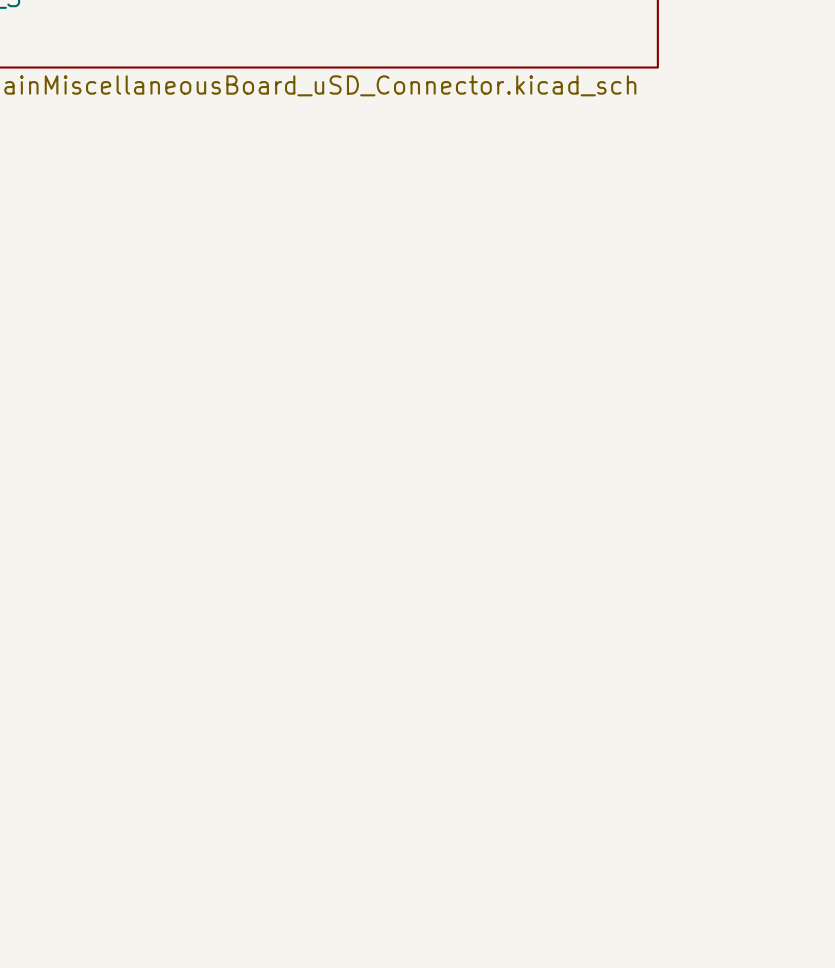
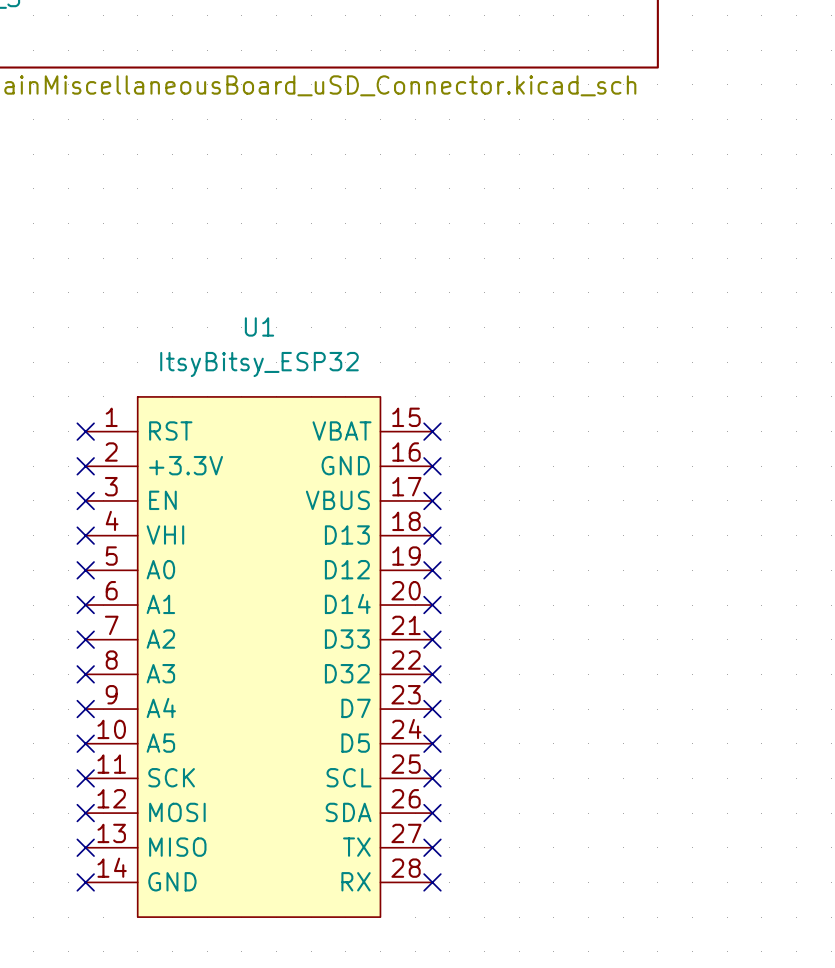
no-connect mark: none -> (85, 431)
no-connect mark: none -> (432, 431)
no-connect mark: none -> (85, 466)
no-connect mark: none -> (432, 466)
no-connect mark: none -> (85, 500)
no-connect mark: none -> (432, 500)
no-connect mark: none -> (85, 535)
no-connect mark: none -> (432, 535)
no-connect mark: none -> (85, 570)
no-connect mark: none -> (432, 570)
no-connect mark: none -> (85, 605)
no-connect mark: none -> (432, 605)
no-connect mark: none -> (85, 639)
no-connect mark: none -> (432, 639)
U1: none -> ItsyBitsy_ESP32 (259, 657)
no-connect mark: none -> (85, 674)
no-connect mark: none -> (432, 674)
no-connect mark: none -> (85, 709)
no-connect mark: none -> (432, 709)
no-connect mark: none -> (85, 743)
no-connect mark: none -> (432, 743)
no-connect mark: none -> (85, 778)
no-connect mark: none -> (432, 778)
no-connect mark: none -> (85, 813)
no-connect mark: none -> (432, 813)
no-connect mark: none -> (85, 847)
no-connect mark: none -> (432, 847)
no-connect mark: none -> (85, 882)
no-connect mark: none -> (432, 882)

